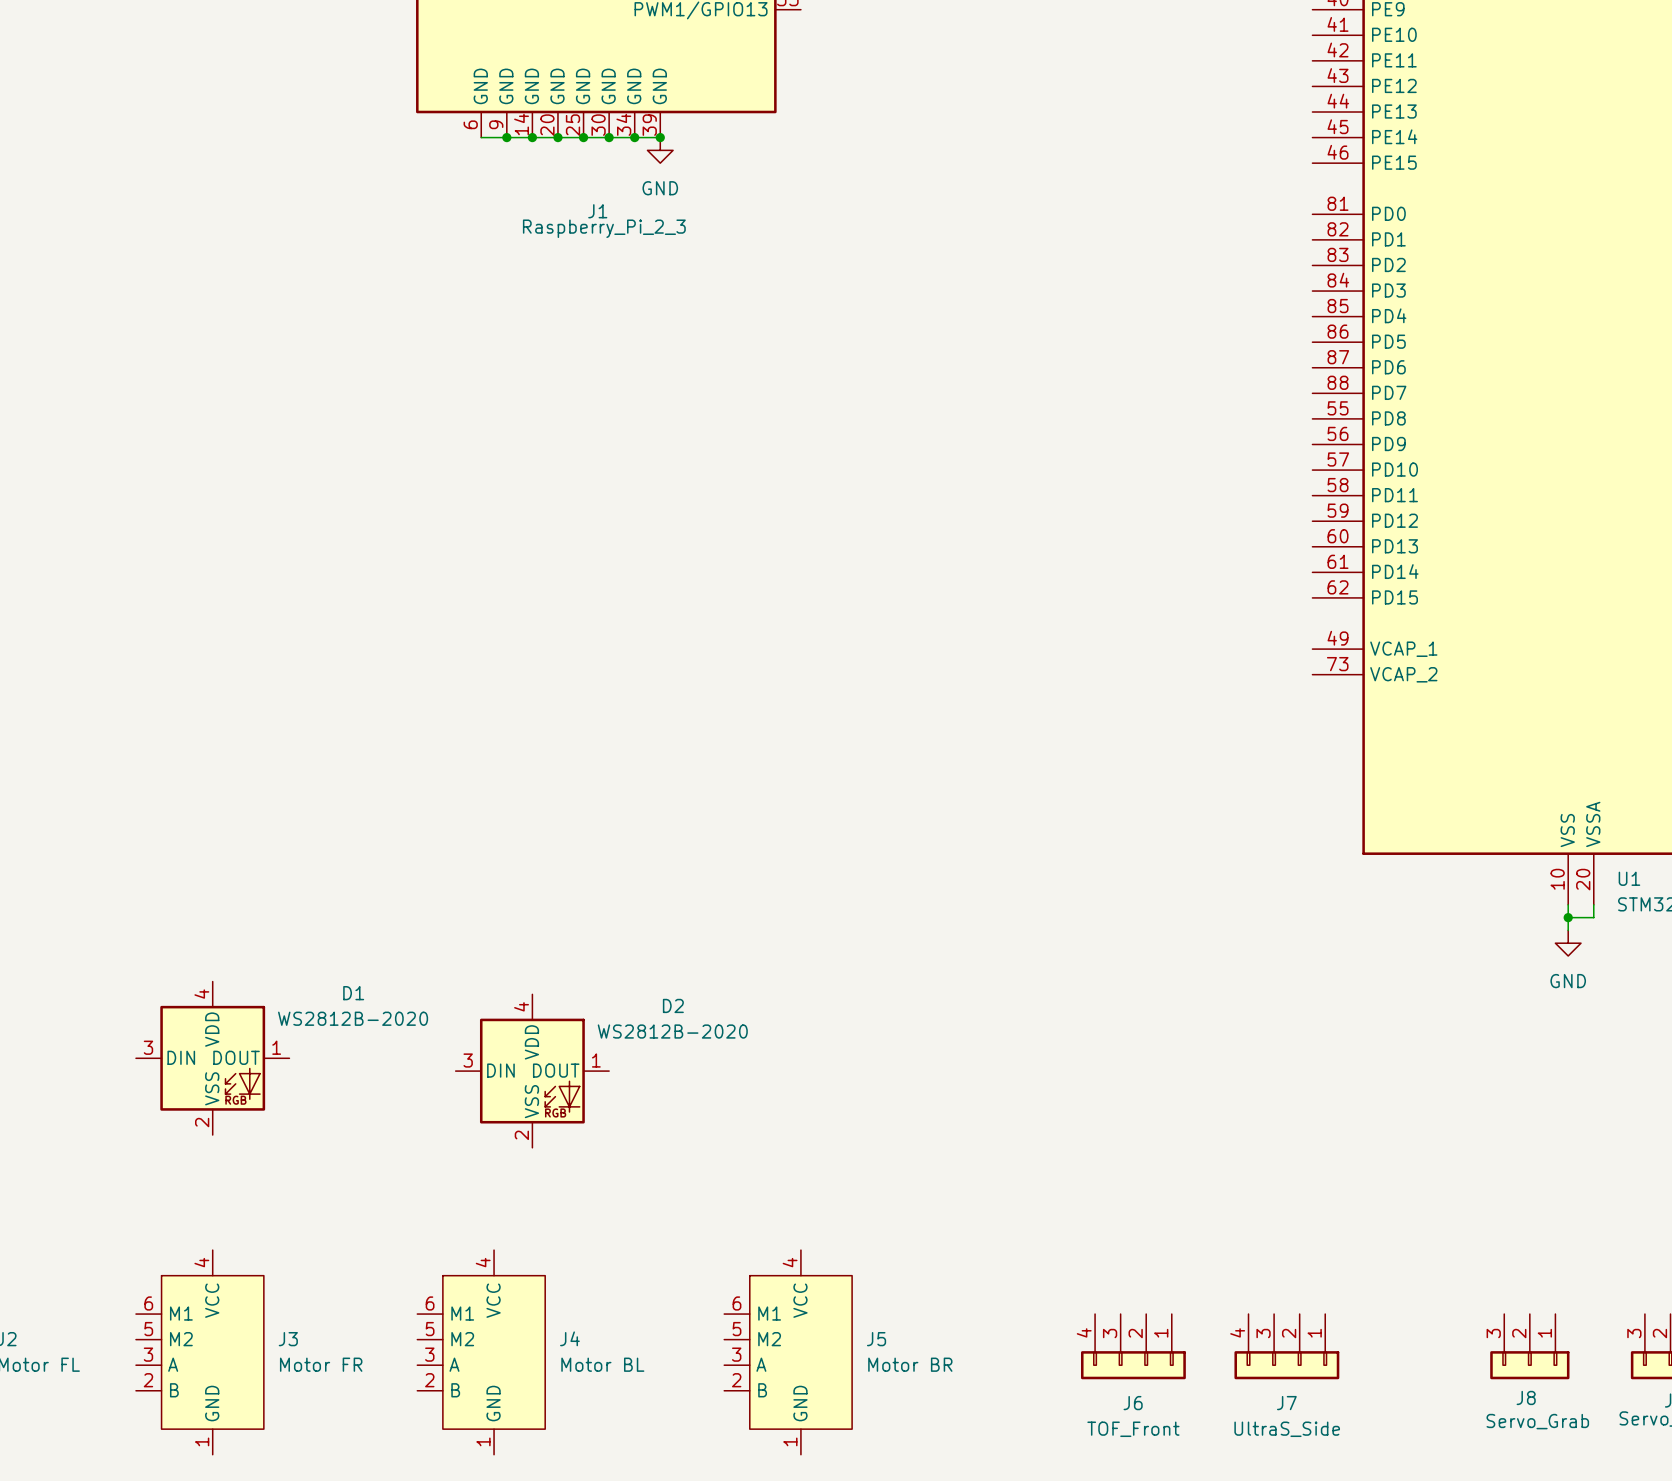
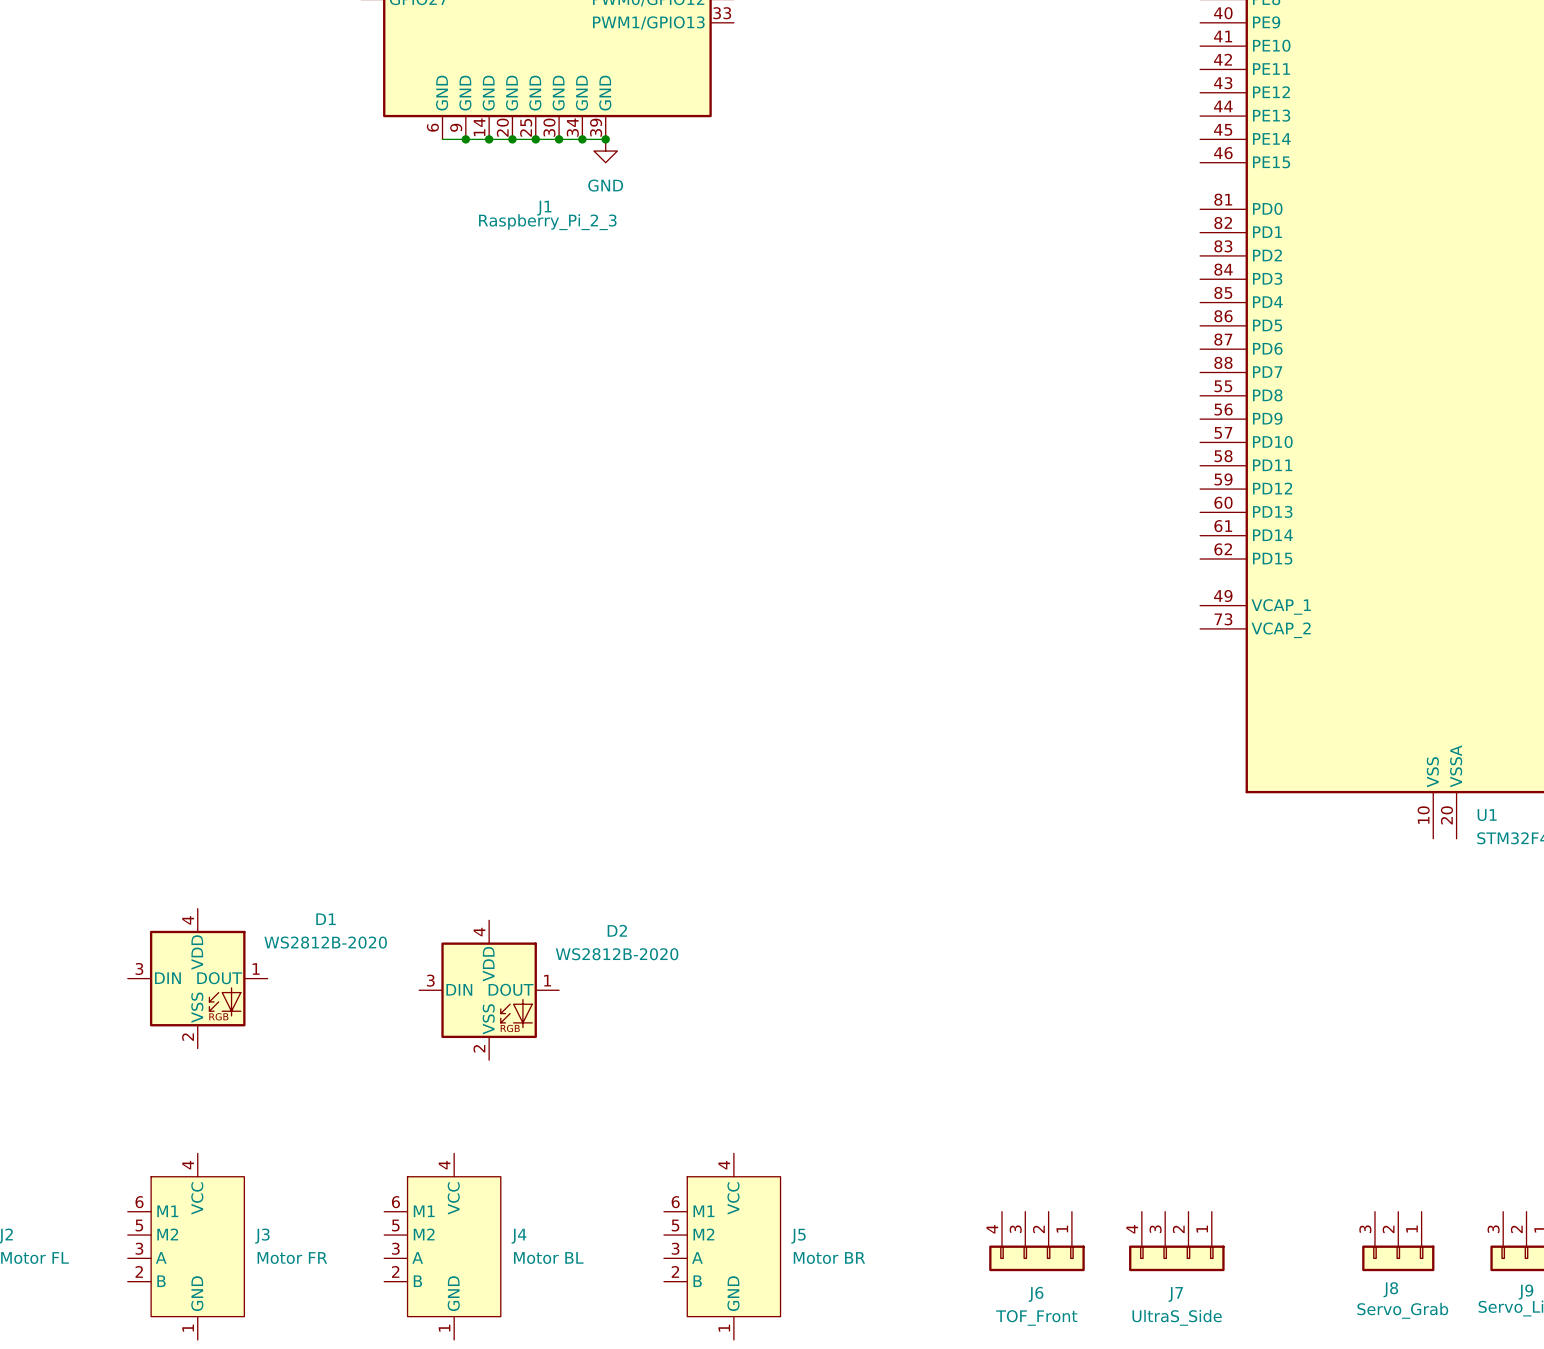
wire: (1568, 904) (1568, 930) -> none
wire: (1593, 904) (1593, 917) (1568, 917) -> none
junction: (1568, 917) -> none
power symbol: GND (1568, 943) -> none

